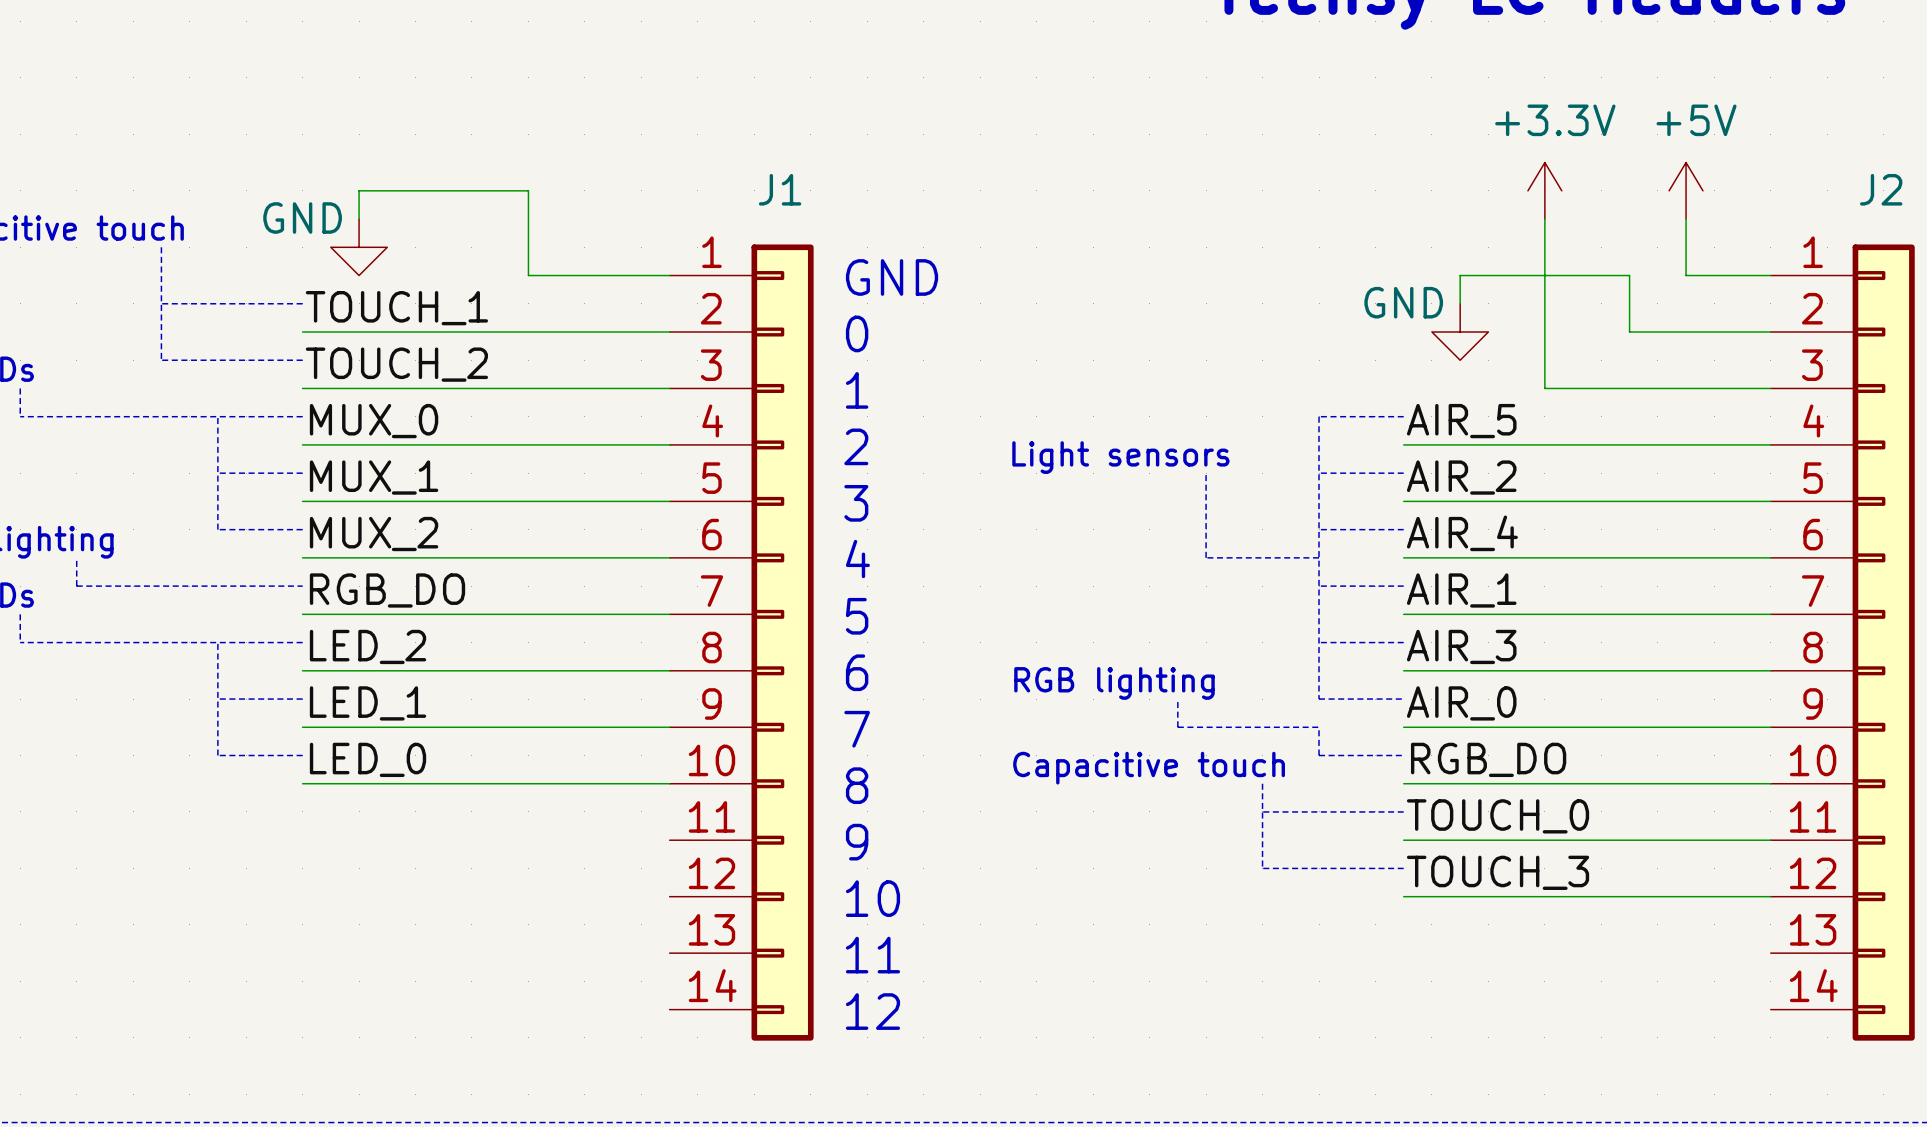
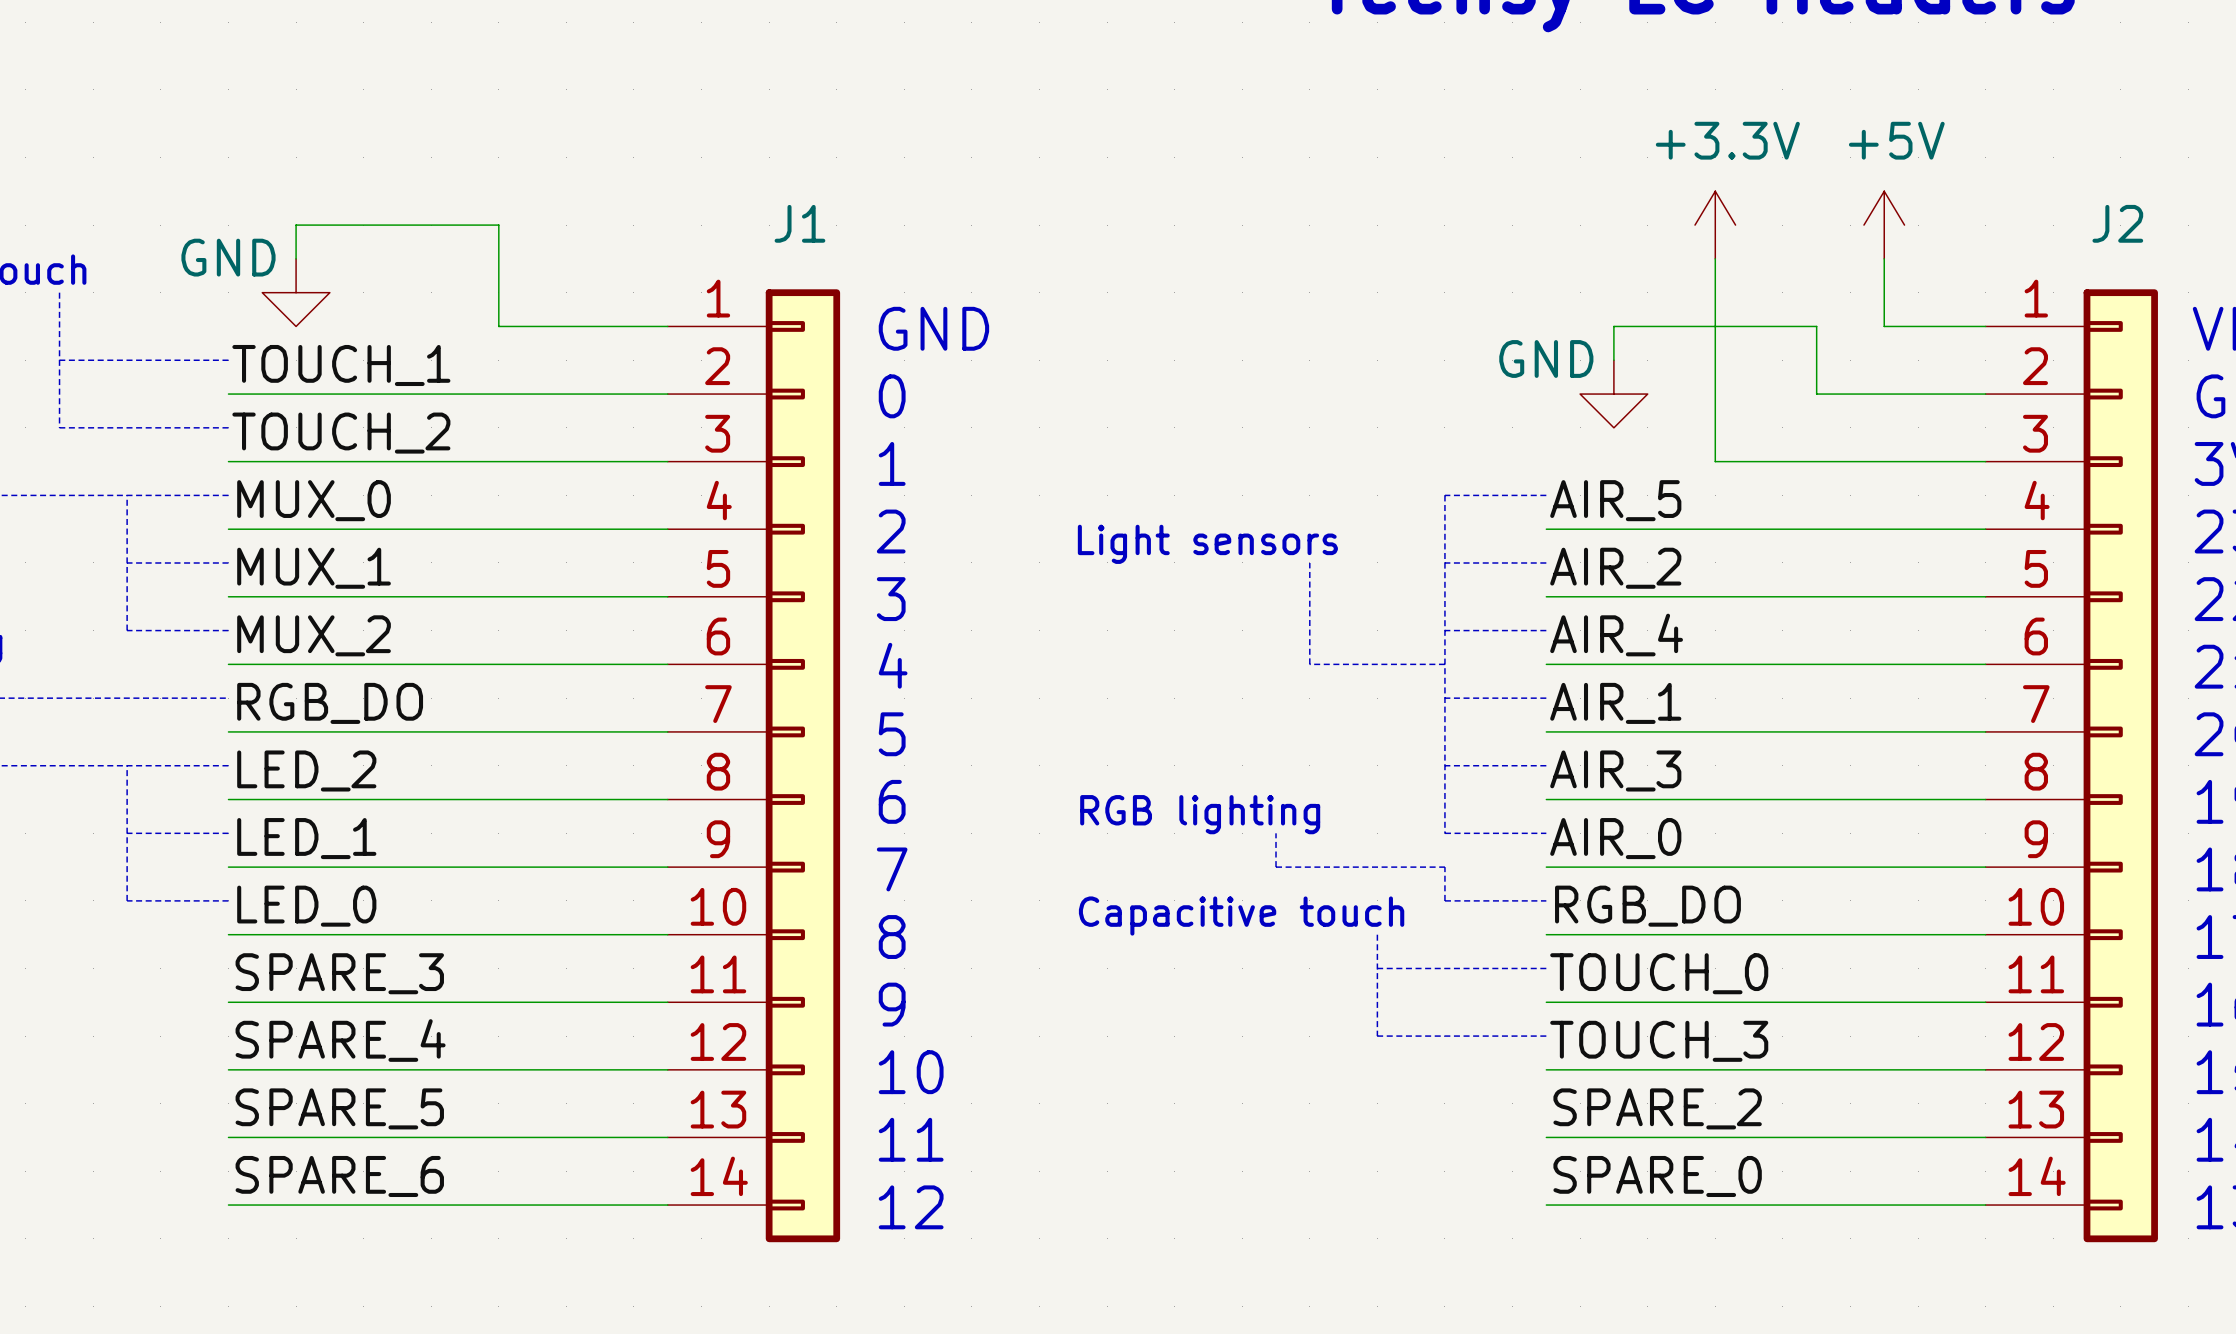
label: none -> SPARE_3 (339, 973)
wire: none -> (228, 1002) (667, 1002)
label: none -> SPARE_4 (340, 1040)
wire: none -> (228, 1069) (667, 1069)
label: none -> SPARE_5 (339, 1108)
label: none -> SPARE_2 (1657, 1108)
wire: none -> (228, 1137) (667, 1137)
wire: none -> (1546, 1137) (1985, 1137)
label: none -> SPARE_6 (339, 1176)
label: none -> SPARE_0 (1657, 1176)
wire: none -> (228, 1205) (667, 1205)
wire: none -> (1546, 1205) (1985, 1205)

